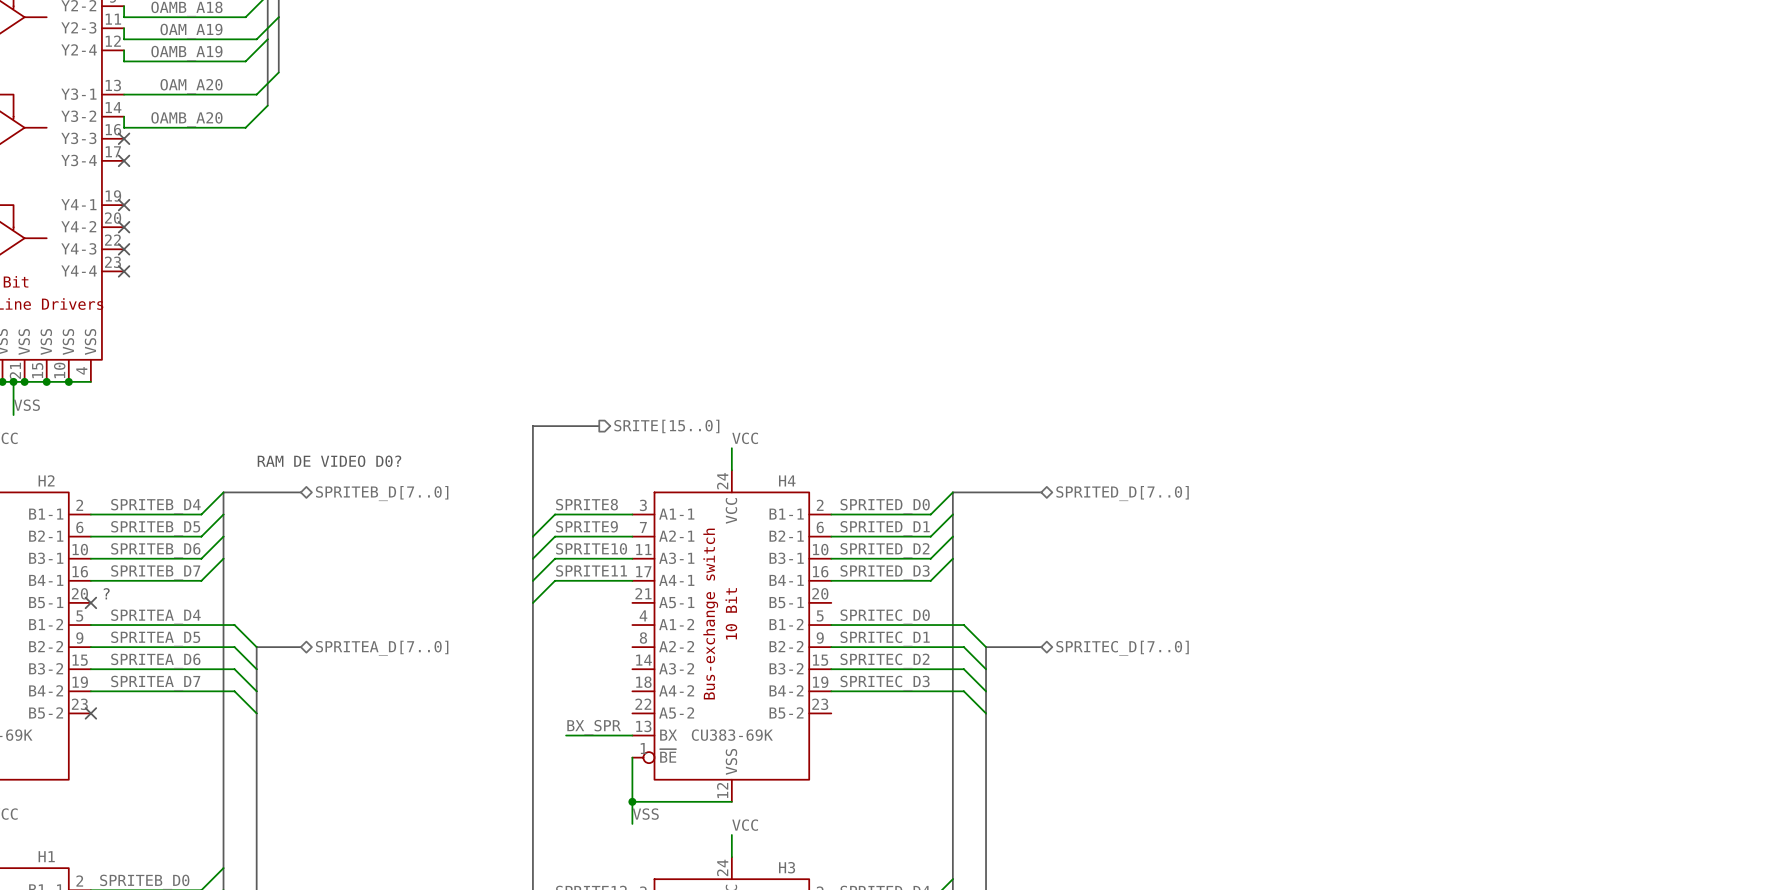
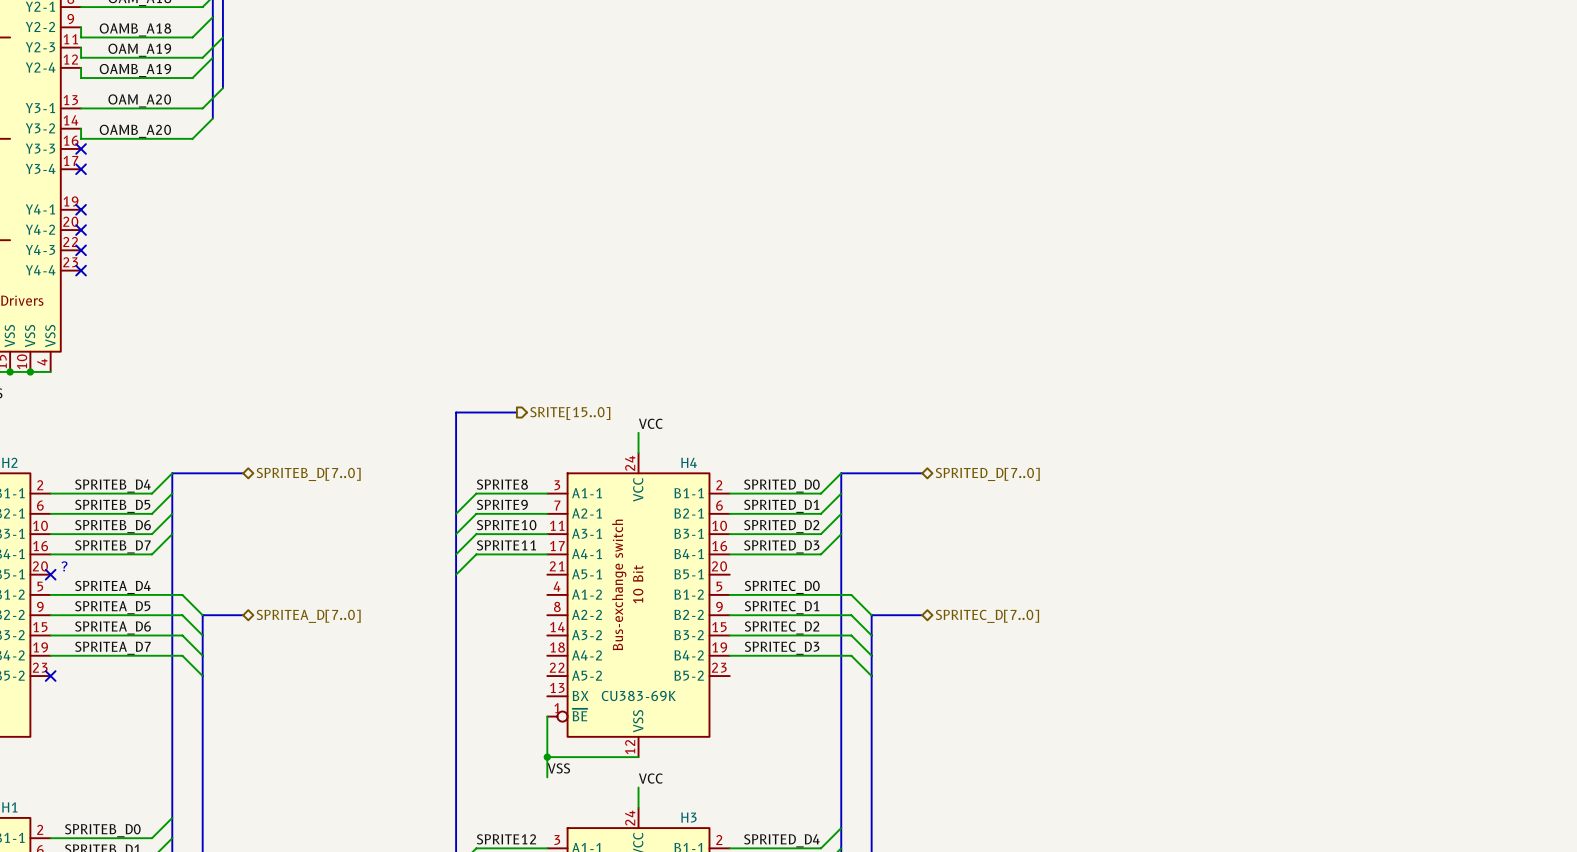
text: RAM DE VIDEO D0? (329, 461) -> none
label: BX_SPR (594, 727) -> none
wire: (566, 735) (632, 735) -> none

